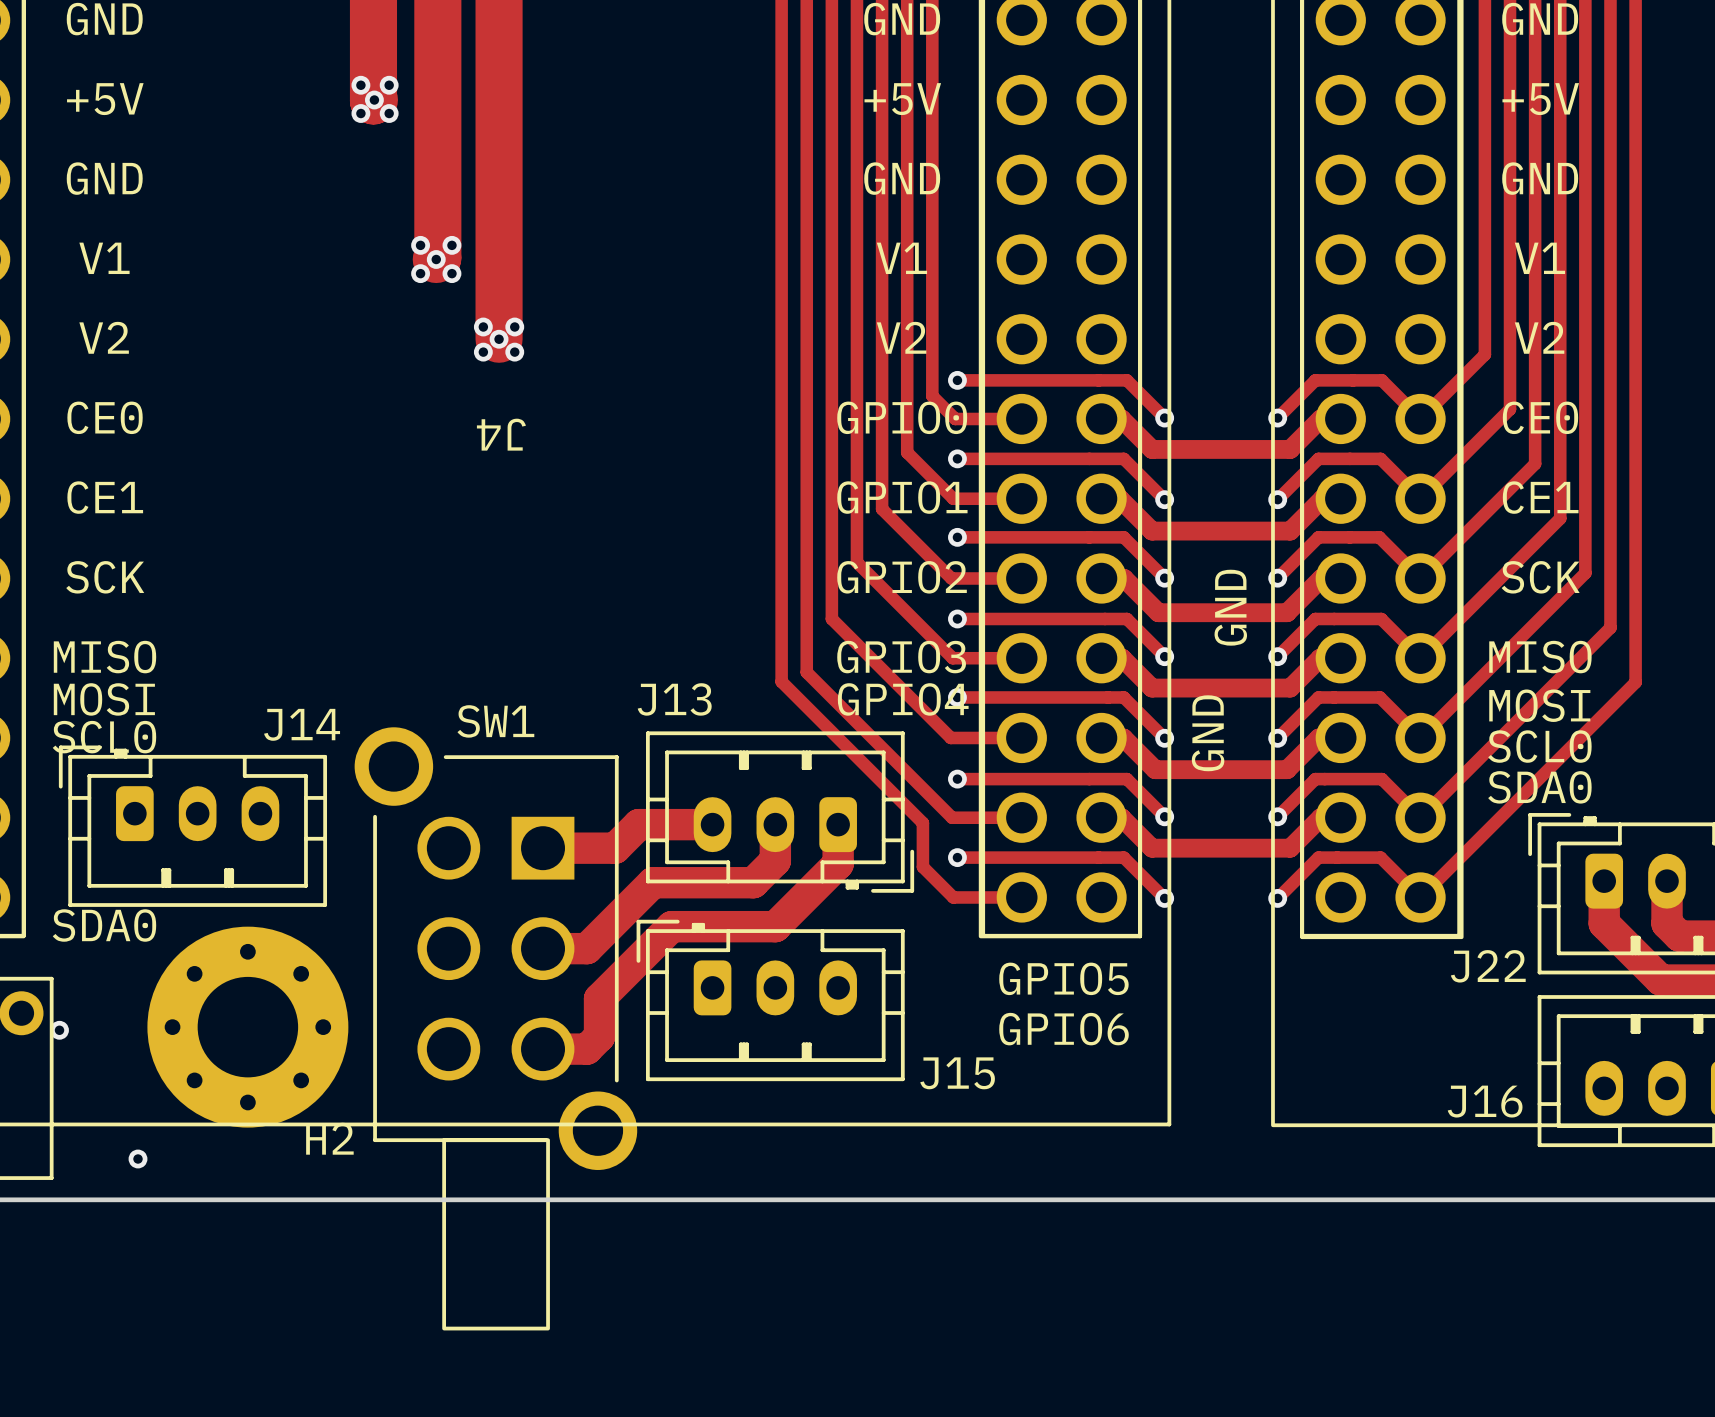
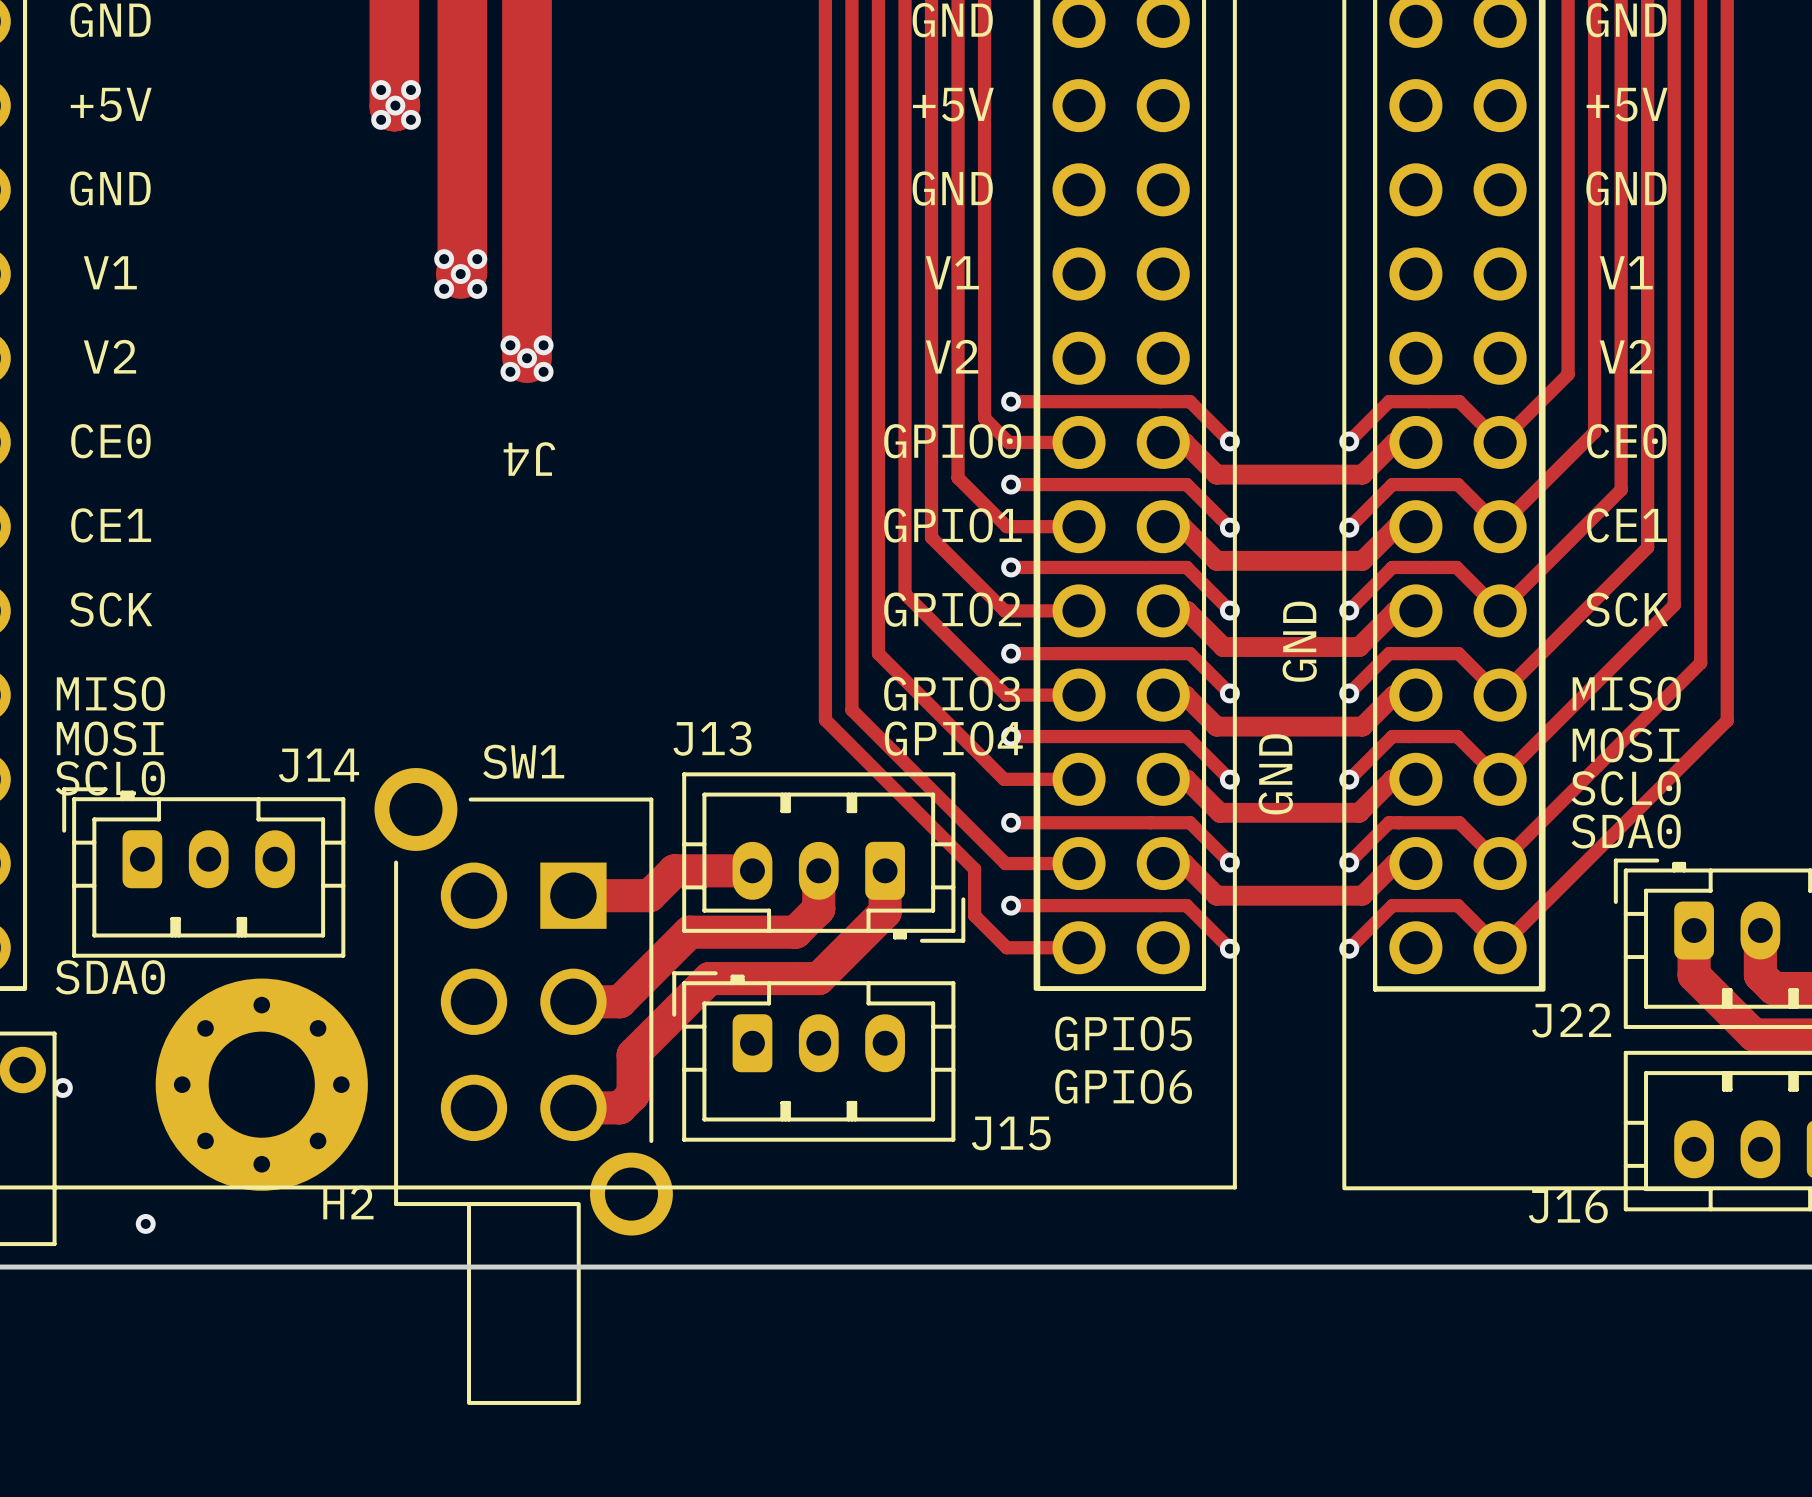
J16 name position: J16 (1485, 1101) -> J16 (1568, 1206)

